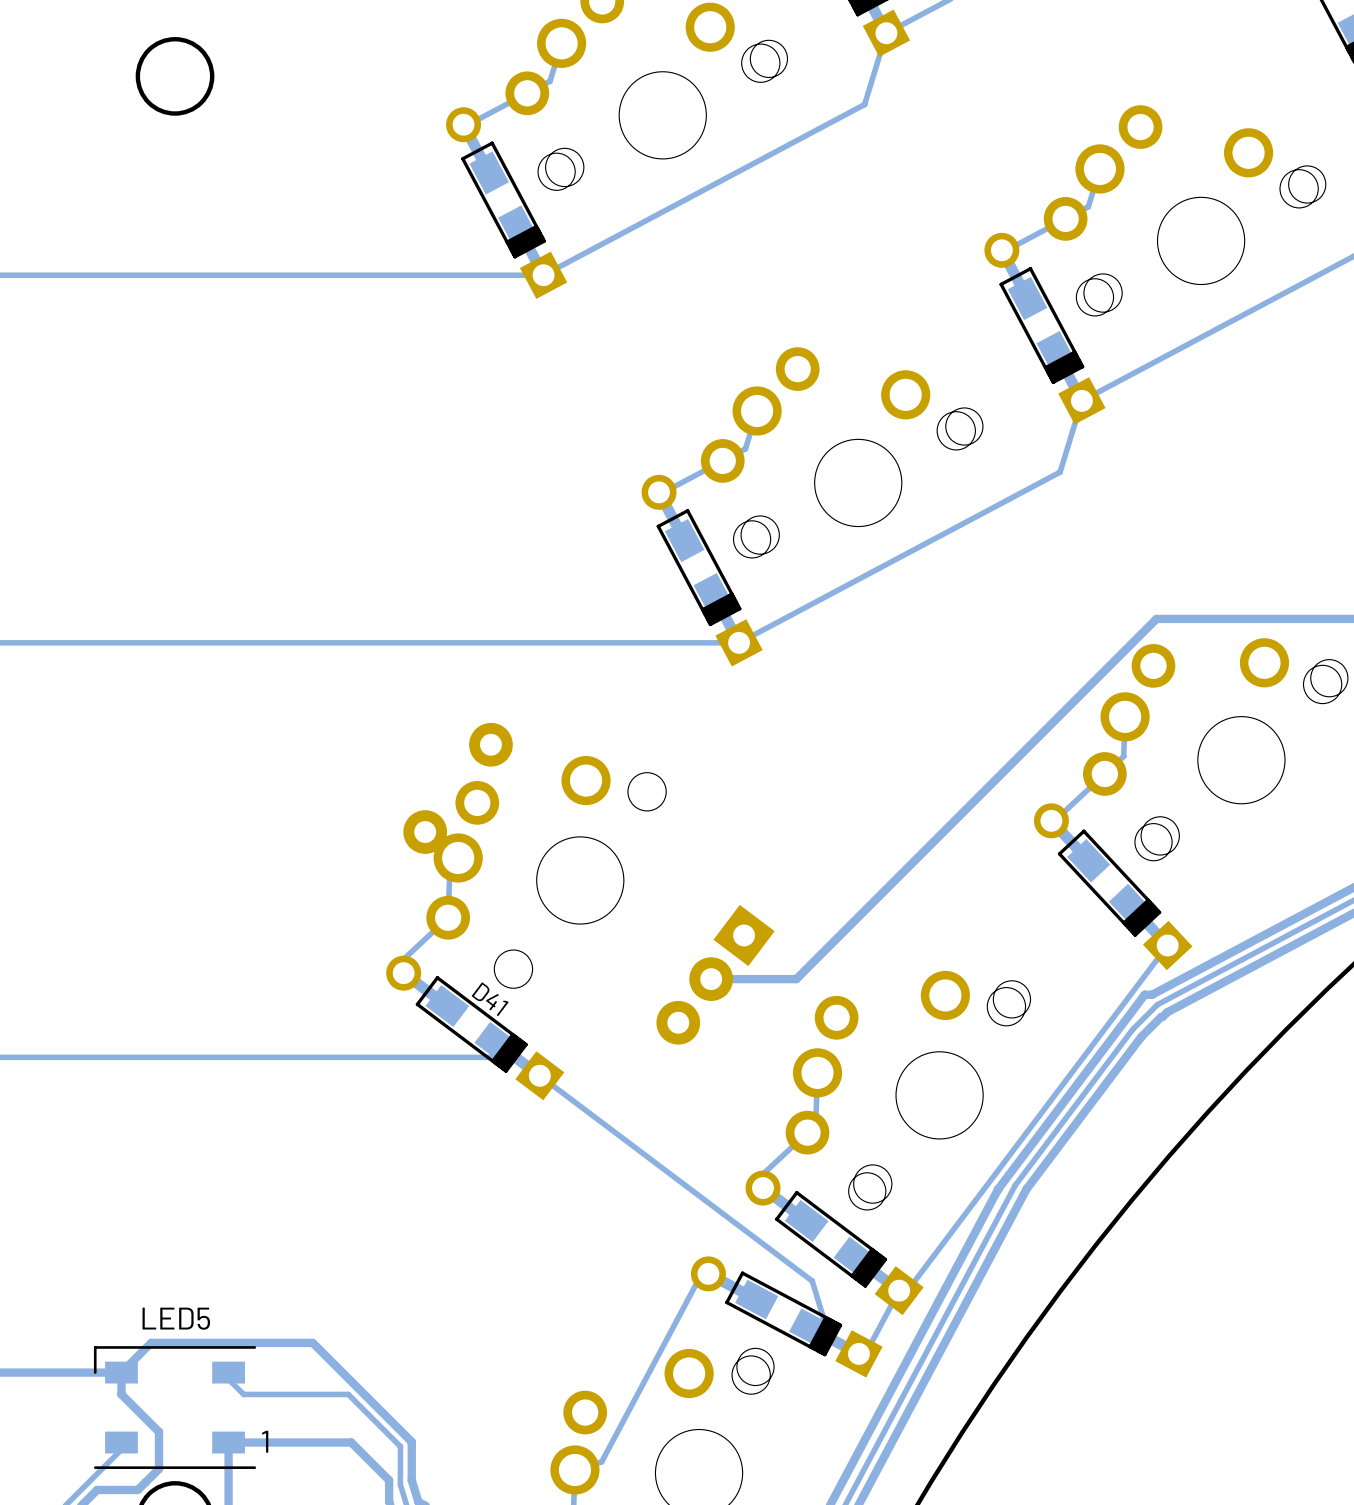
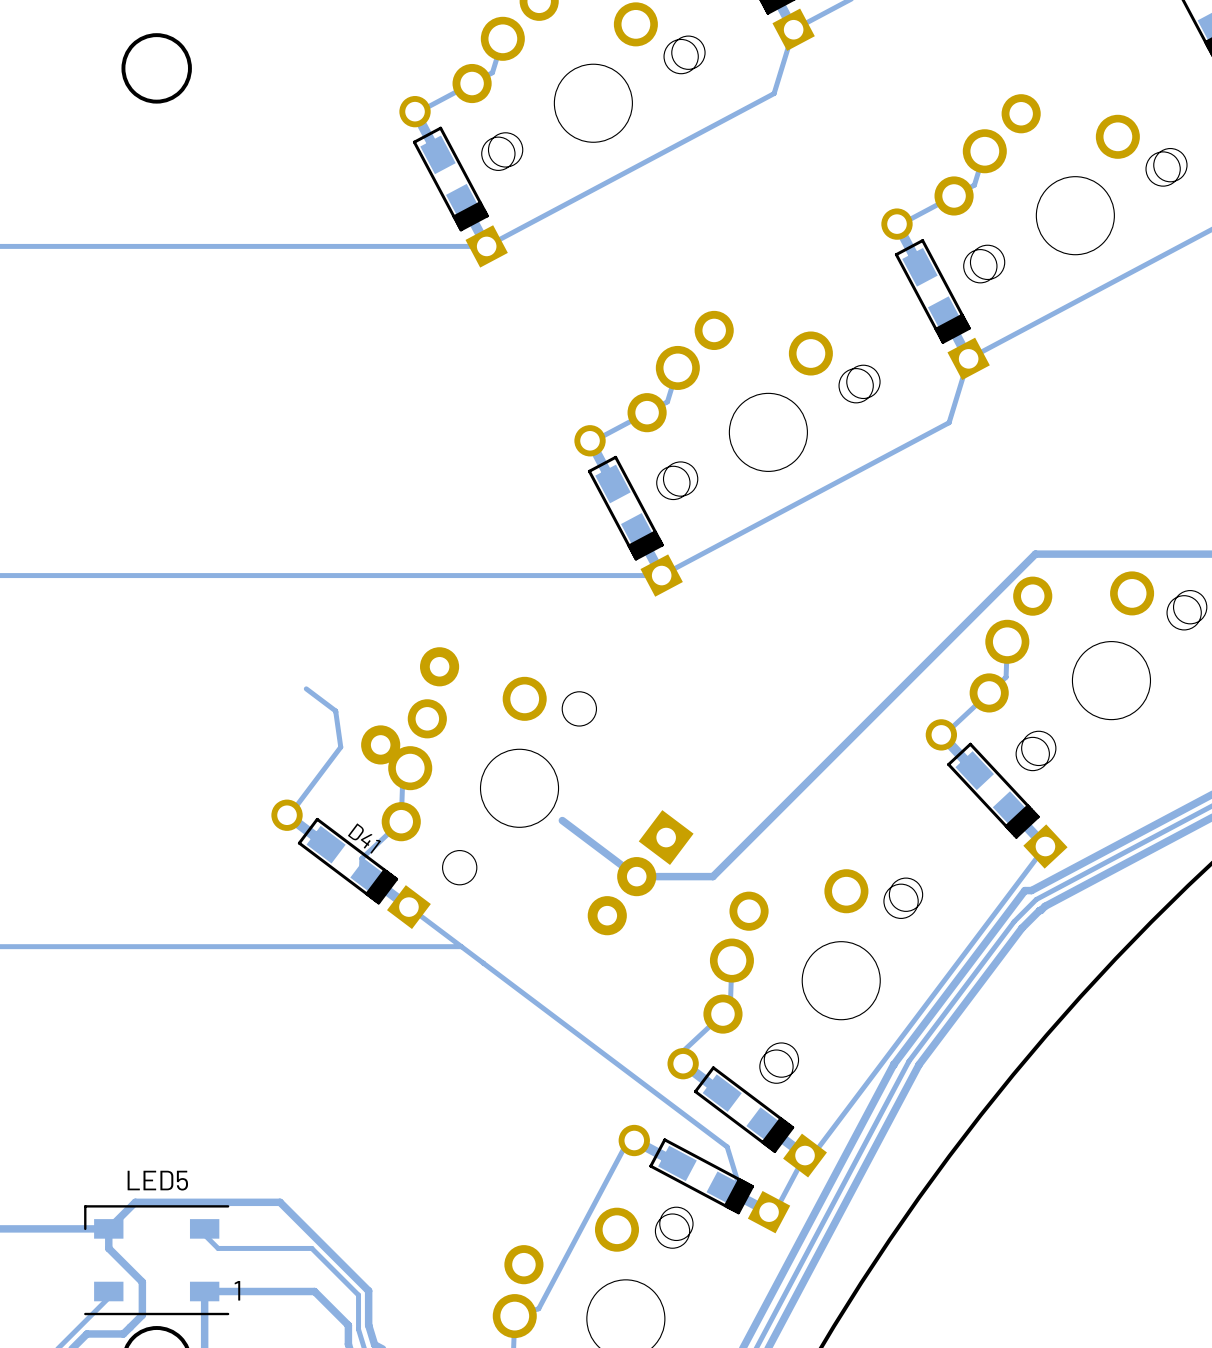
track: none -> (306, 688) (335, 711) (340, 747) (289, 814) (287, 815)
track: none -> (562, 820) (636, 876)
track: none -> (408, 907) (483, 963)
D41 position: (475, 1027) -> (351, 864)

